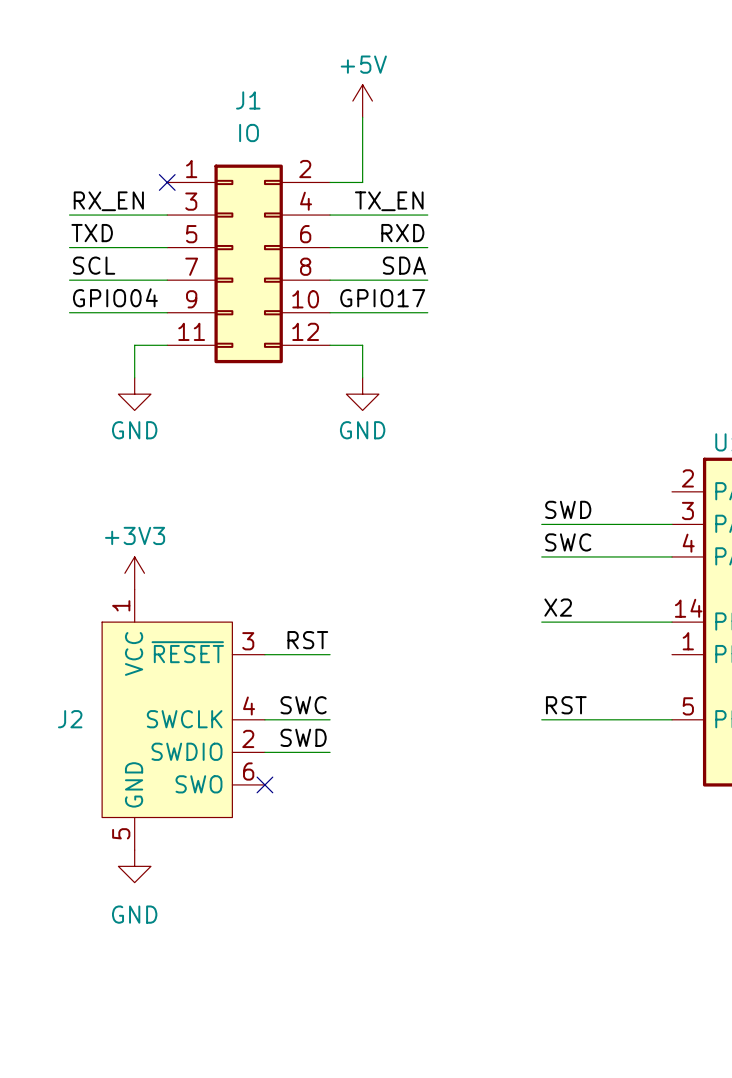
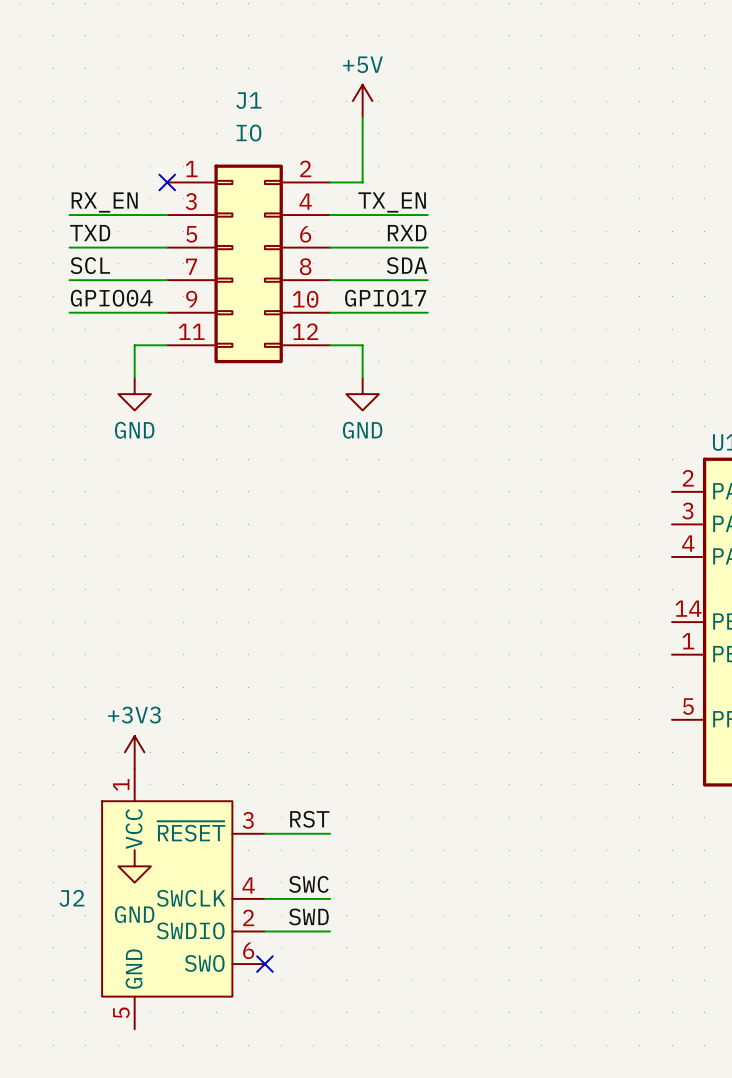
label: SWD (568, 509) -> none
wire: (541, 524) (672, 524) -> none
label: SWC (568, 542) -> none
wire: (541, 556) (672, 556) -> none
power symbol position: +3V3 (134, 573) -> +3V3 (134, 752)
label: X2 (558, 607) -> none
wire: (541, 622) (672, 622) -> none
label: RST (307, 640) -> none
wire: (264, 654) (330, 654) -> (264, 833) (330, 833)
label position: SWC (303, 705) -> SWC (308, 884)
label: RST (566, 705) -> none
J2 position: (183, 719) -> (183, 898)
wire: (264, 719) (330, 719) -> (264, 898) (330, 898)
wire: (541, 719) (672, 719) -> none
label position: SWD (303, 737) -> SWD (308, 916)
wire: (264, 752) (330, 752) -> (264, 931) (330, 931)
no-connect mark: (264, 784) -> none
label: none -> RST (309, 819)
no-connect mark: none -> (264, 964)

